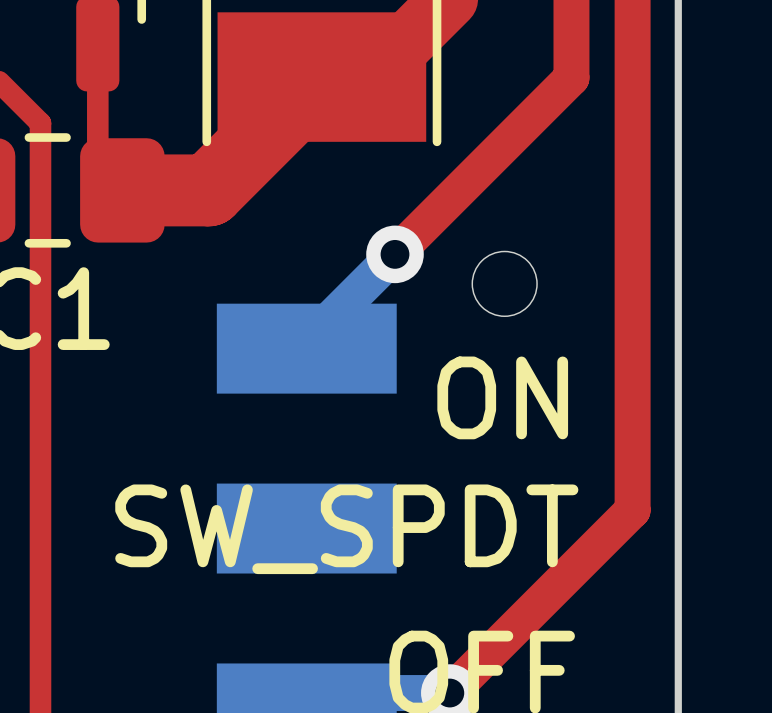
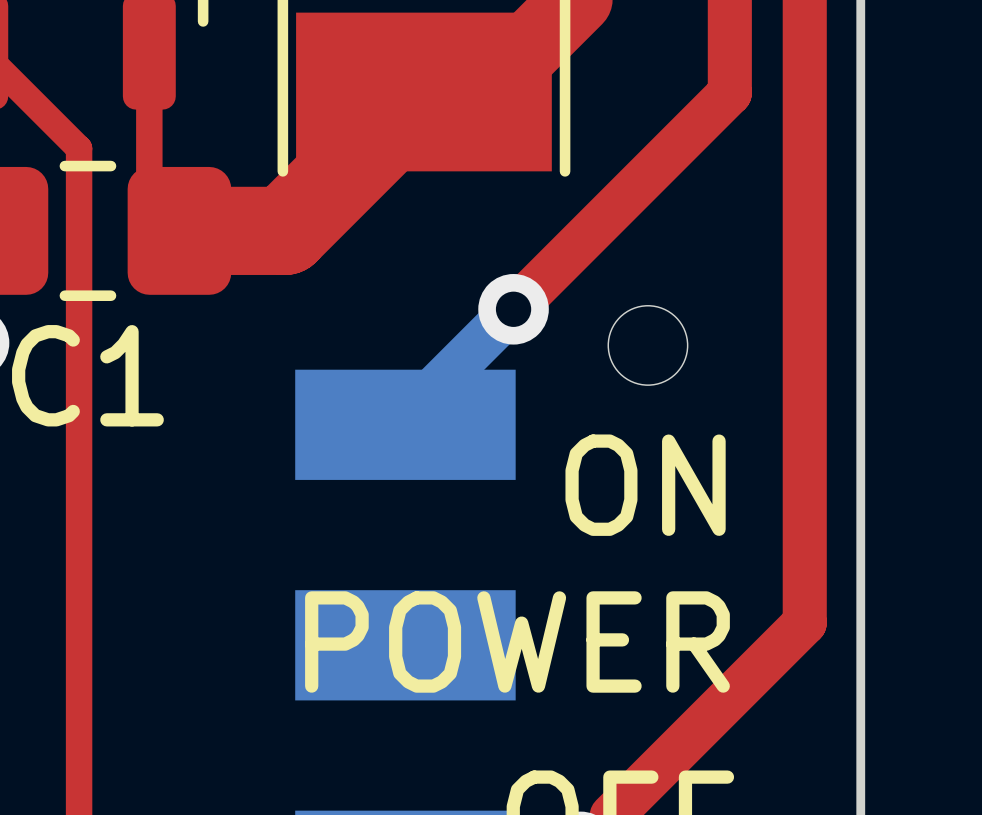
part value: SW_SPDT (346, 529) -> POWER (517, 641)

